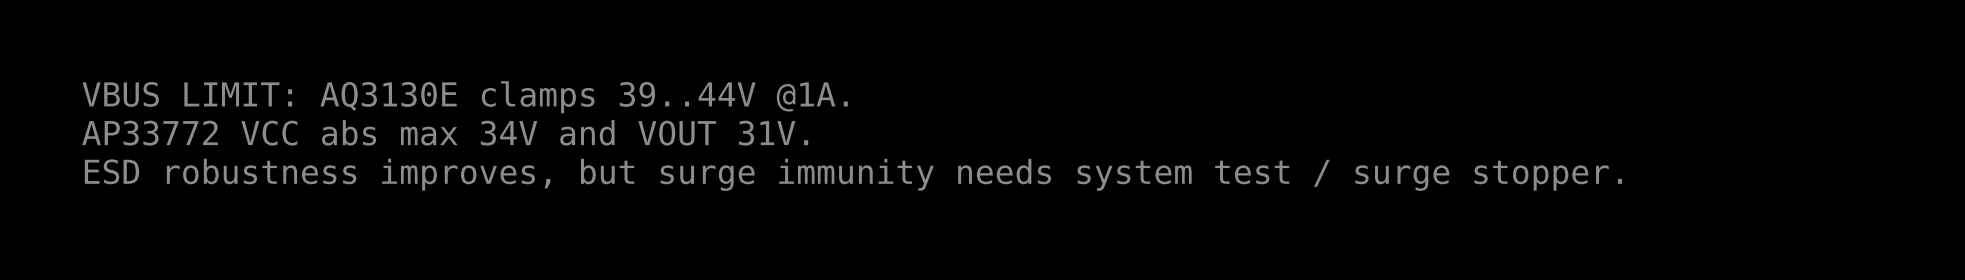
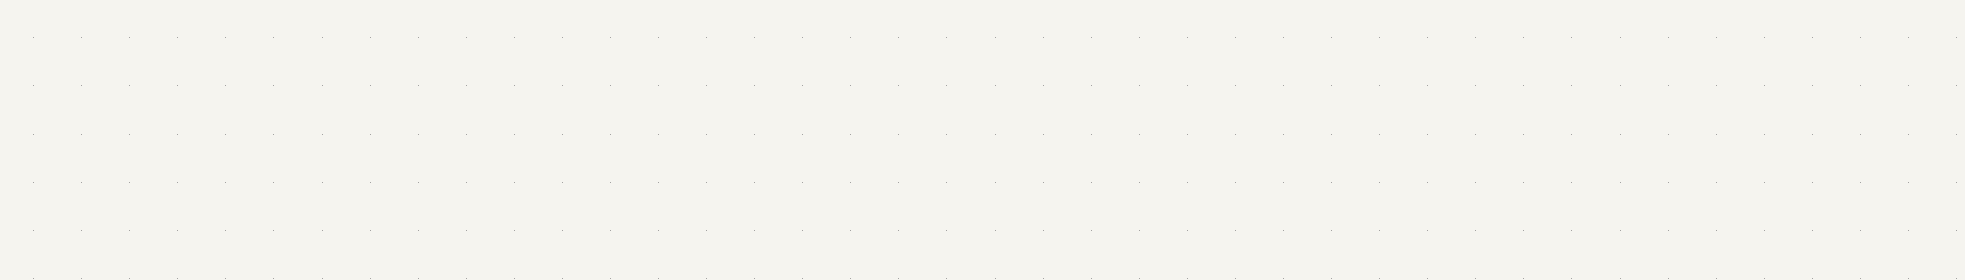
text: VBUS LIMIT: AQ3130E clamps 39..44V @1A. (465, 97) -> none
text: AP33772 VCC abs max 34V and VOUT 31V. (445, 132) -> none
text: ESD robustness improves, but surge immunity needs system test / surge stopper. (853, 174) -> none

